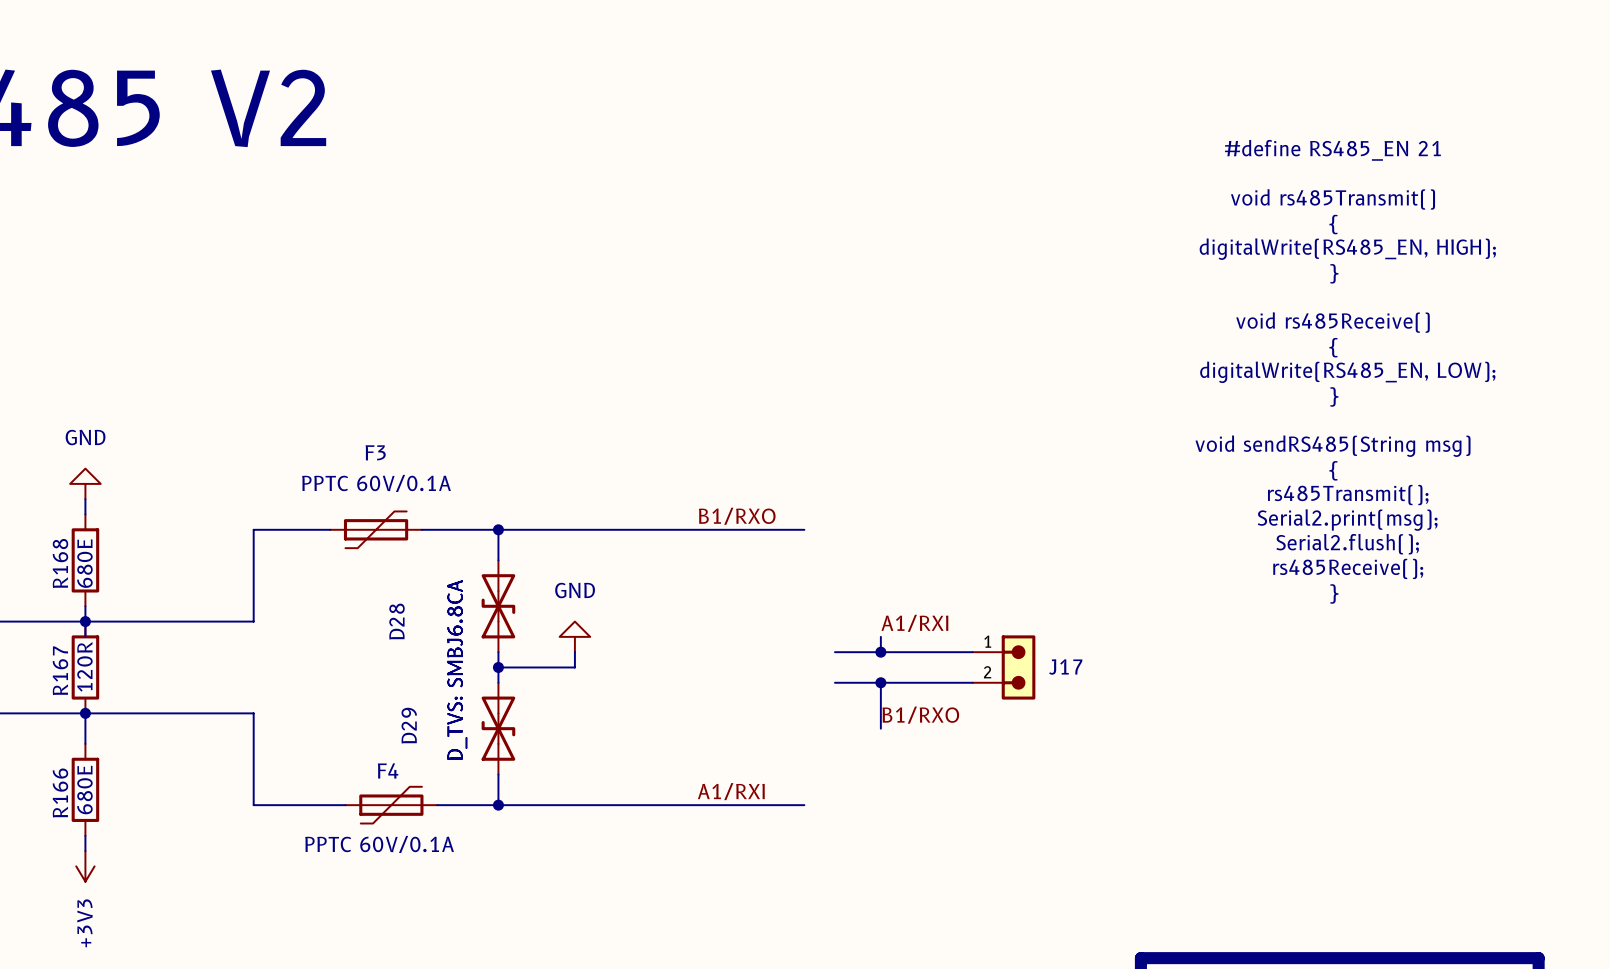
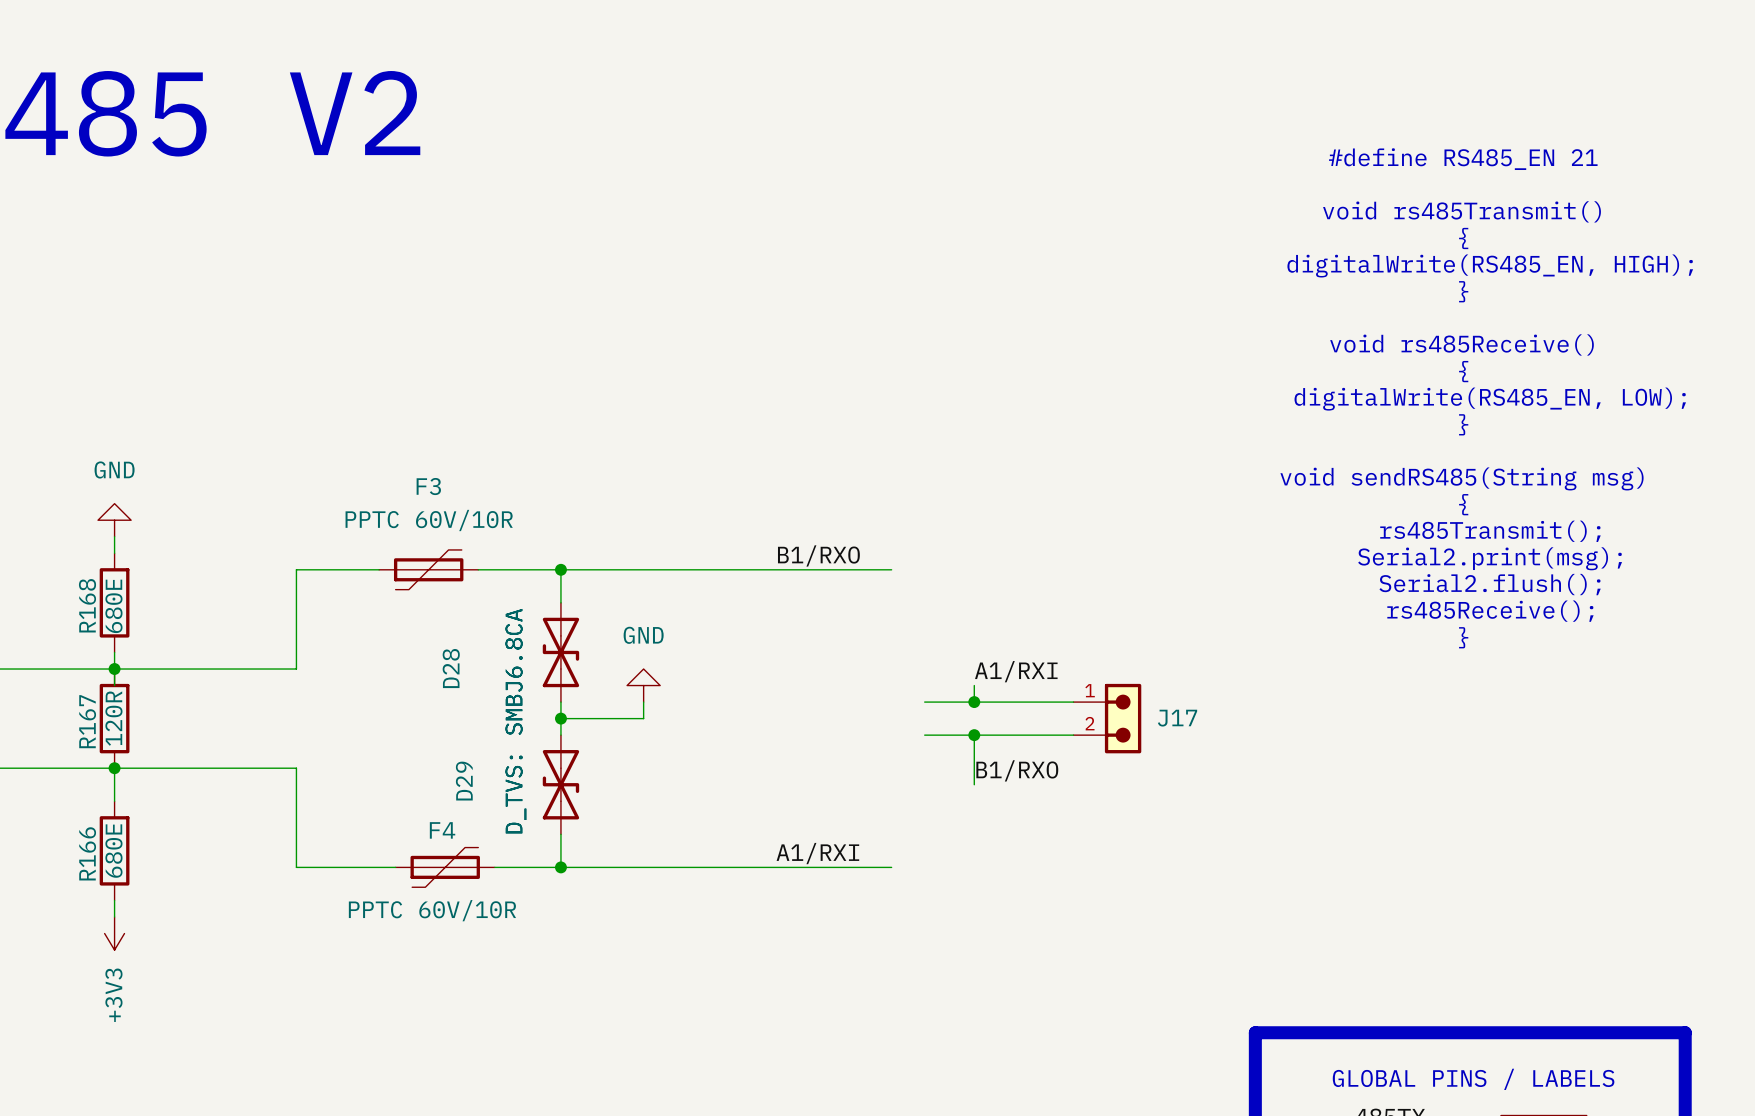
F3 value: PPTC 60V/0.1A (376, 483) -> PPTC 60V/10R (429, 520)
F4 value: PPTC 60V/0.1A (379, 844) -> PPTC 60V/10R (432, 910)

